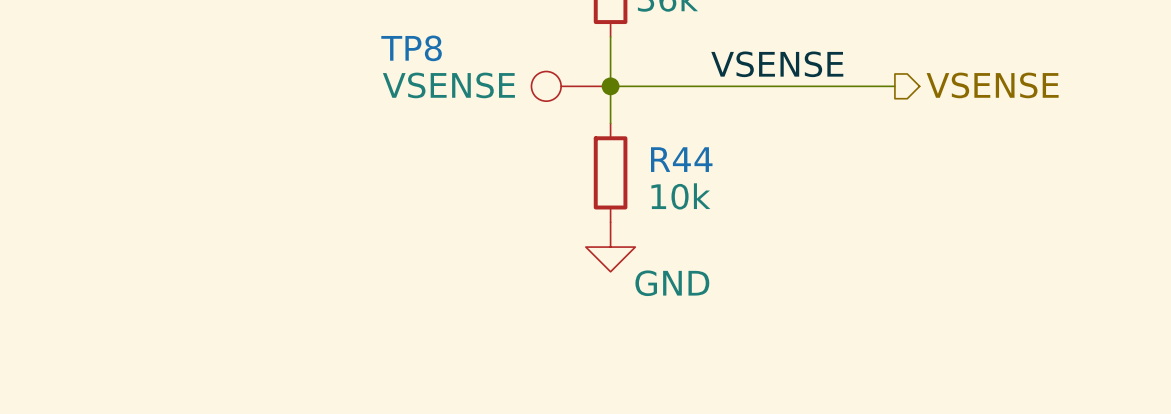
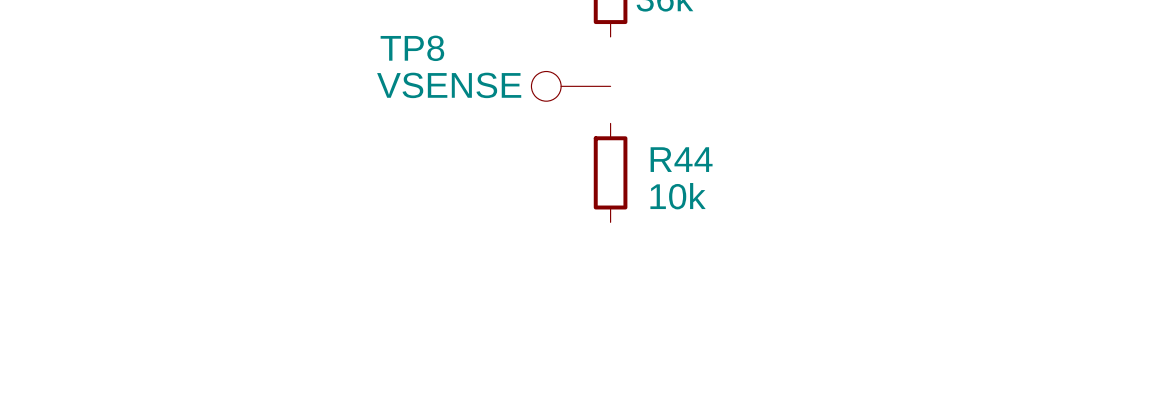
wire: (610, 36) (610, 123) -> none
label: VSENSE (777, 64) -> none
hierarchical label: VSENSE (992, 85) -> none
wire: (610, 86) (894, 86) -> none
junction: (610, 86) -> none
power symbol: GND (610, 247) -> none

